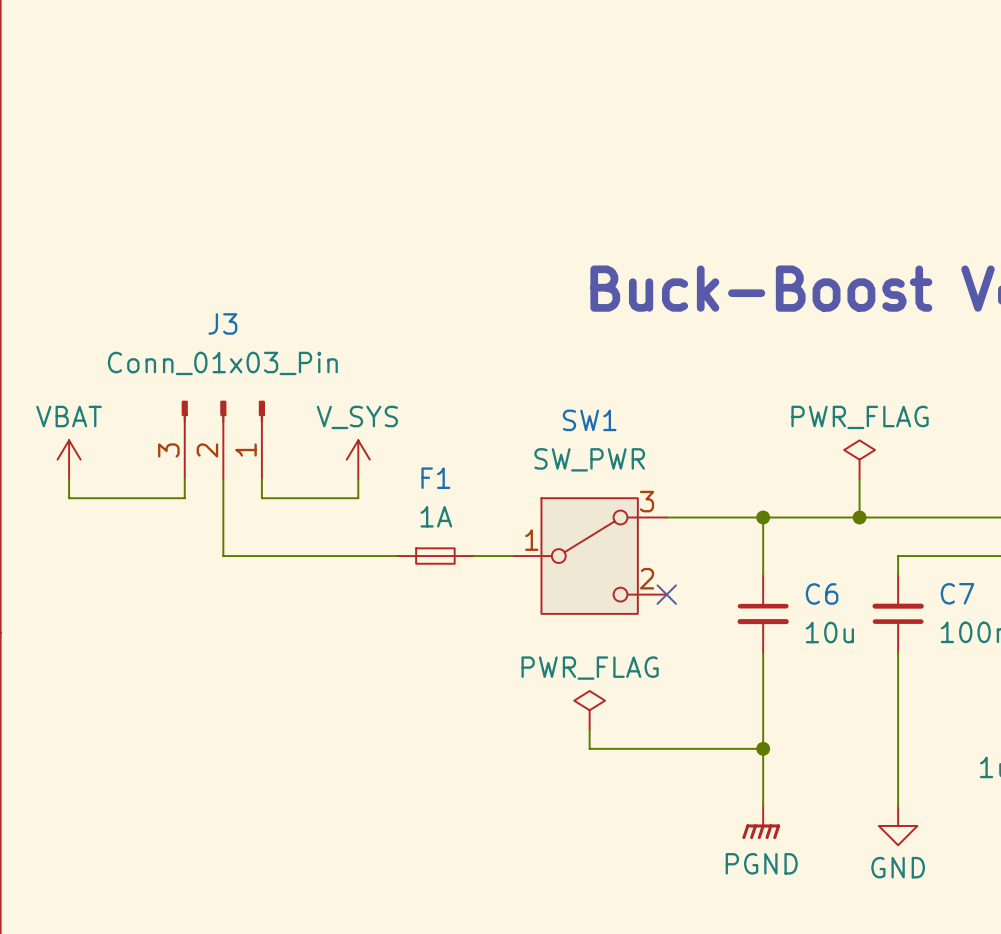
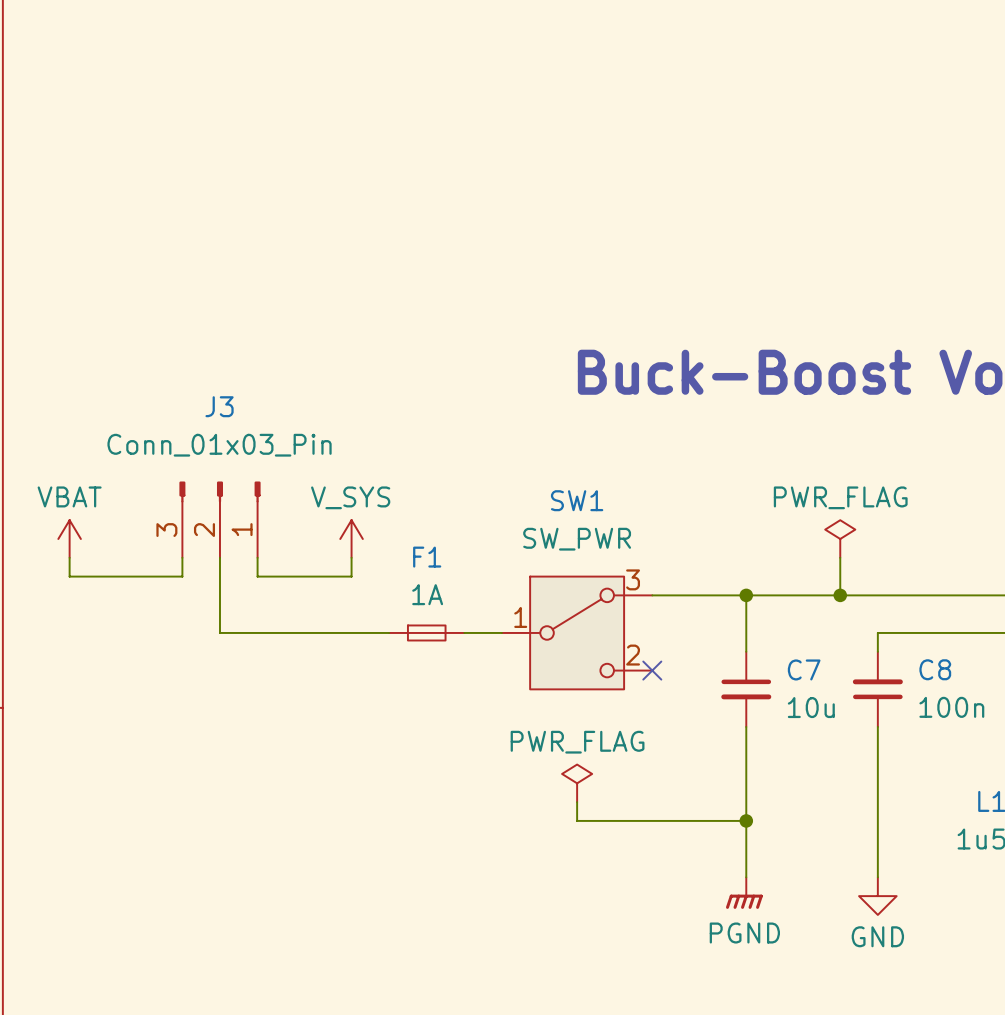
C6 name: C6 (822, 593) -> C7 (804, 669)
C7 name: C7 (957, 593) -> C8 (935, 669)

